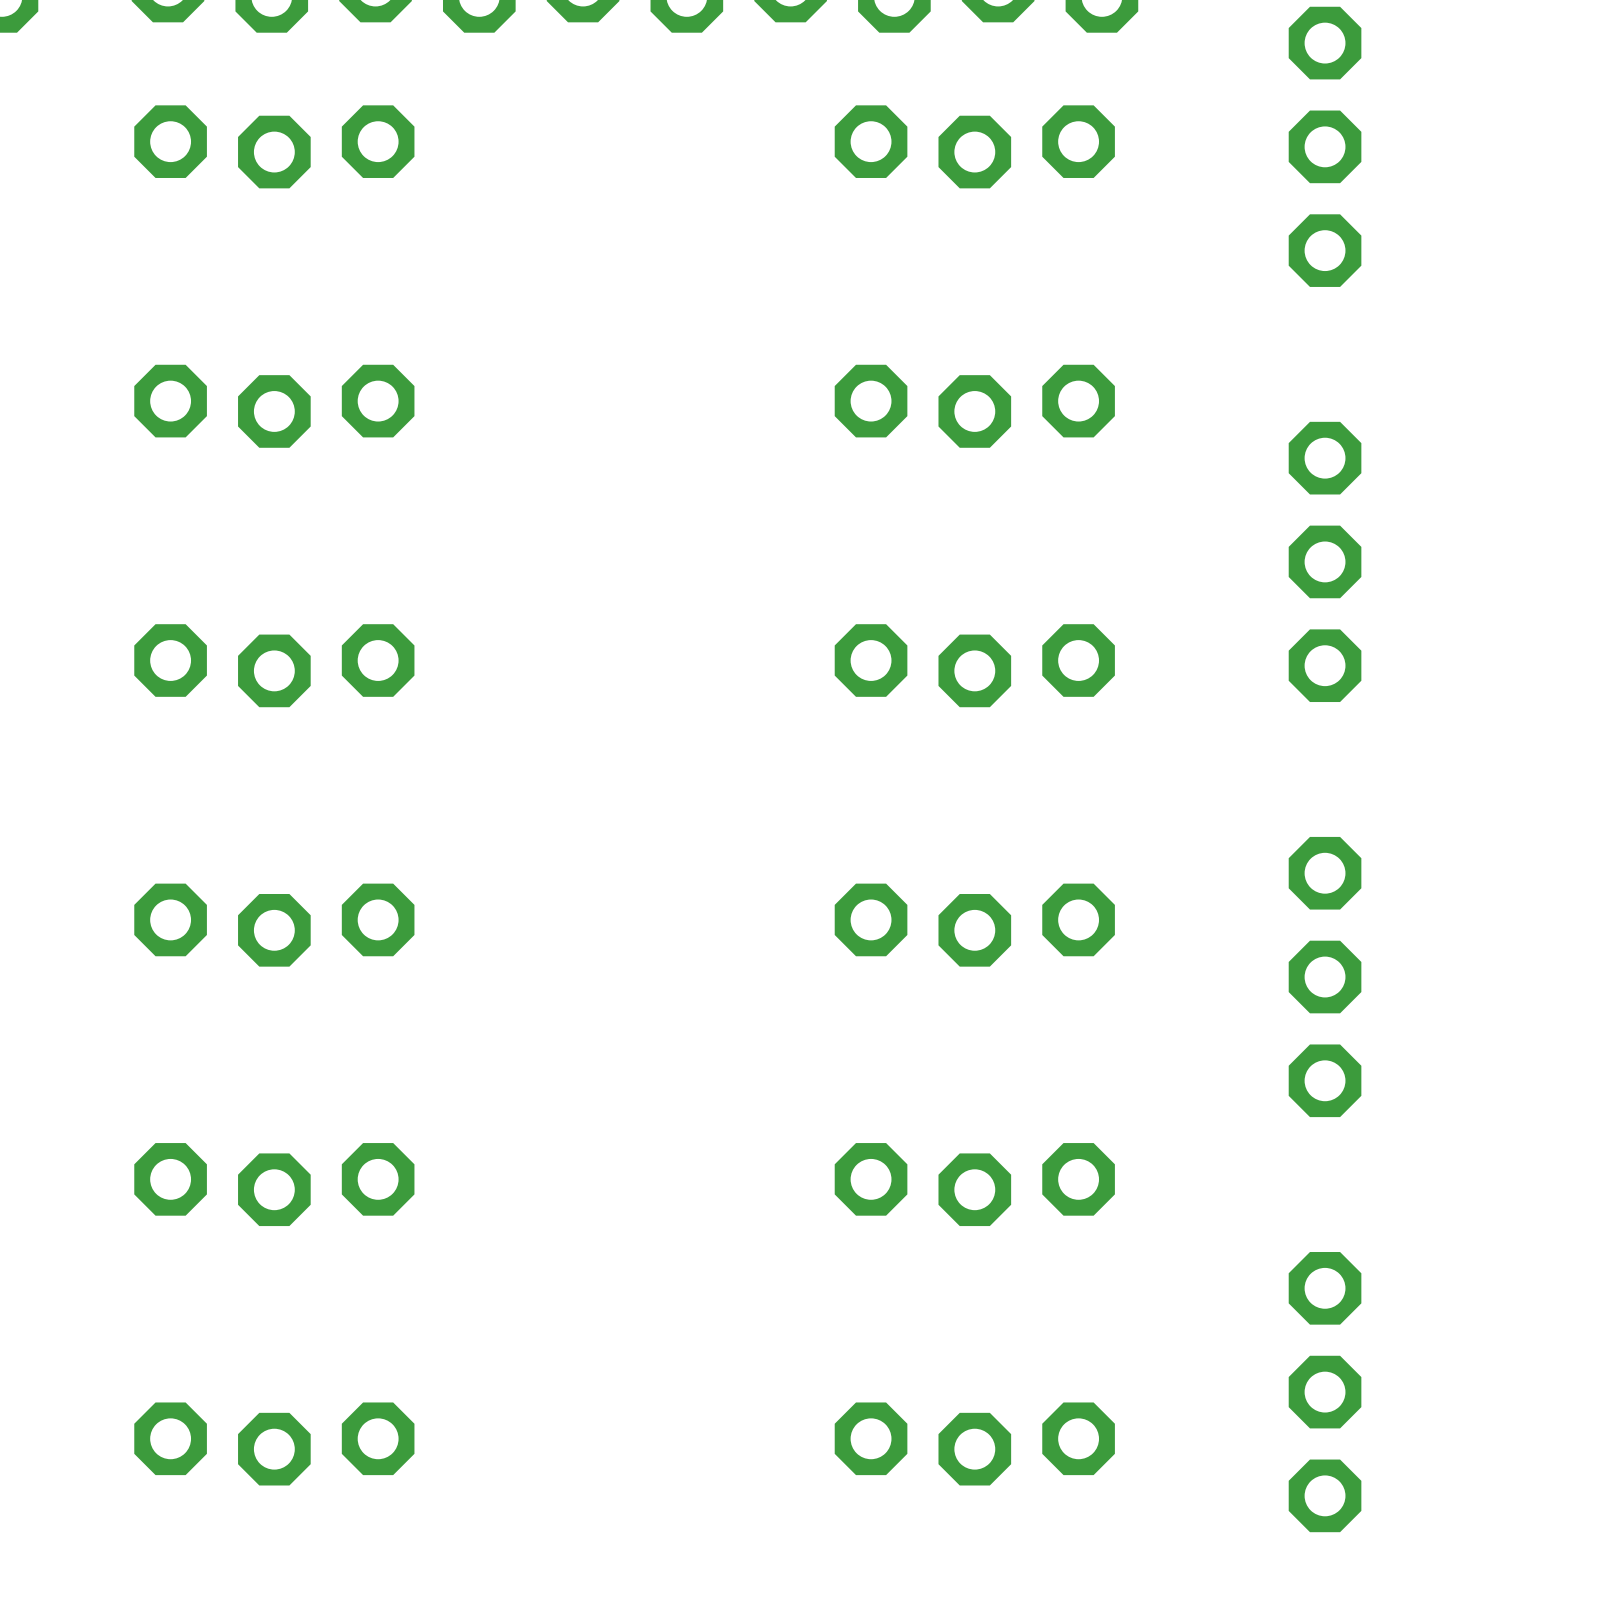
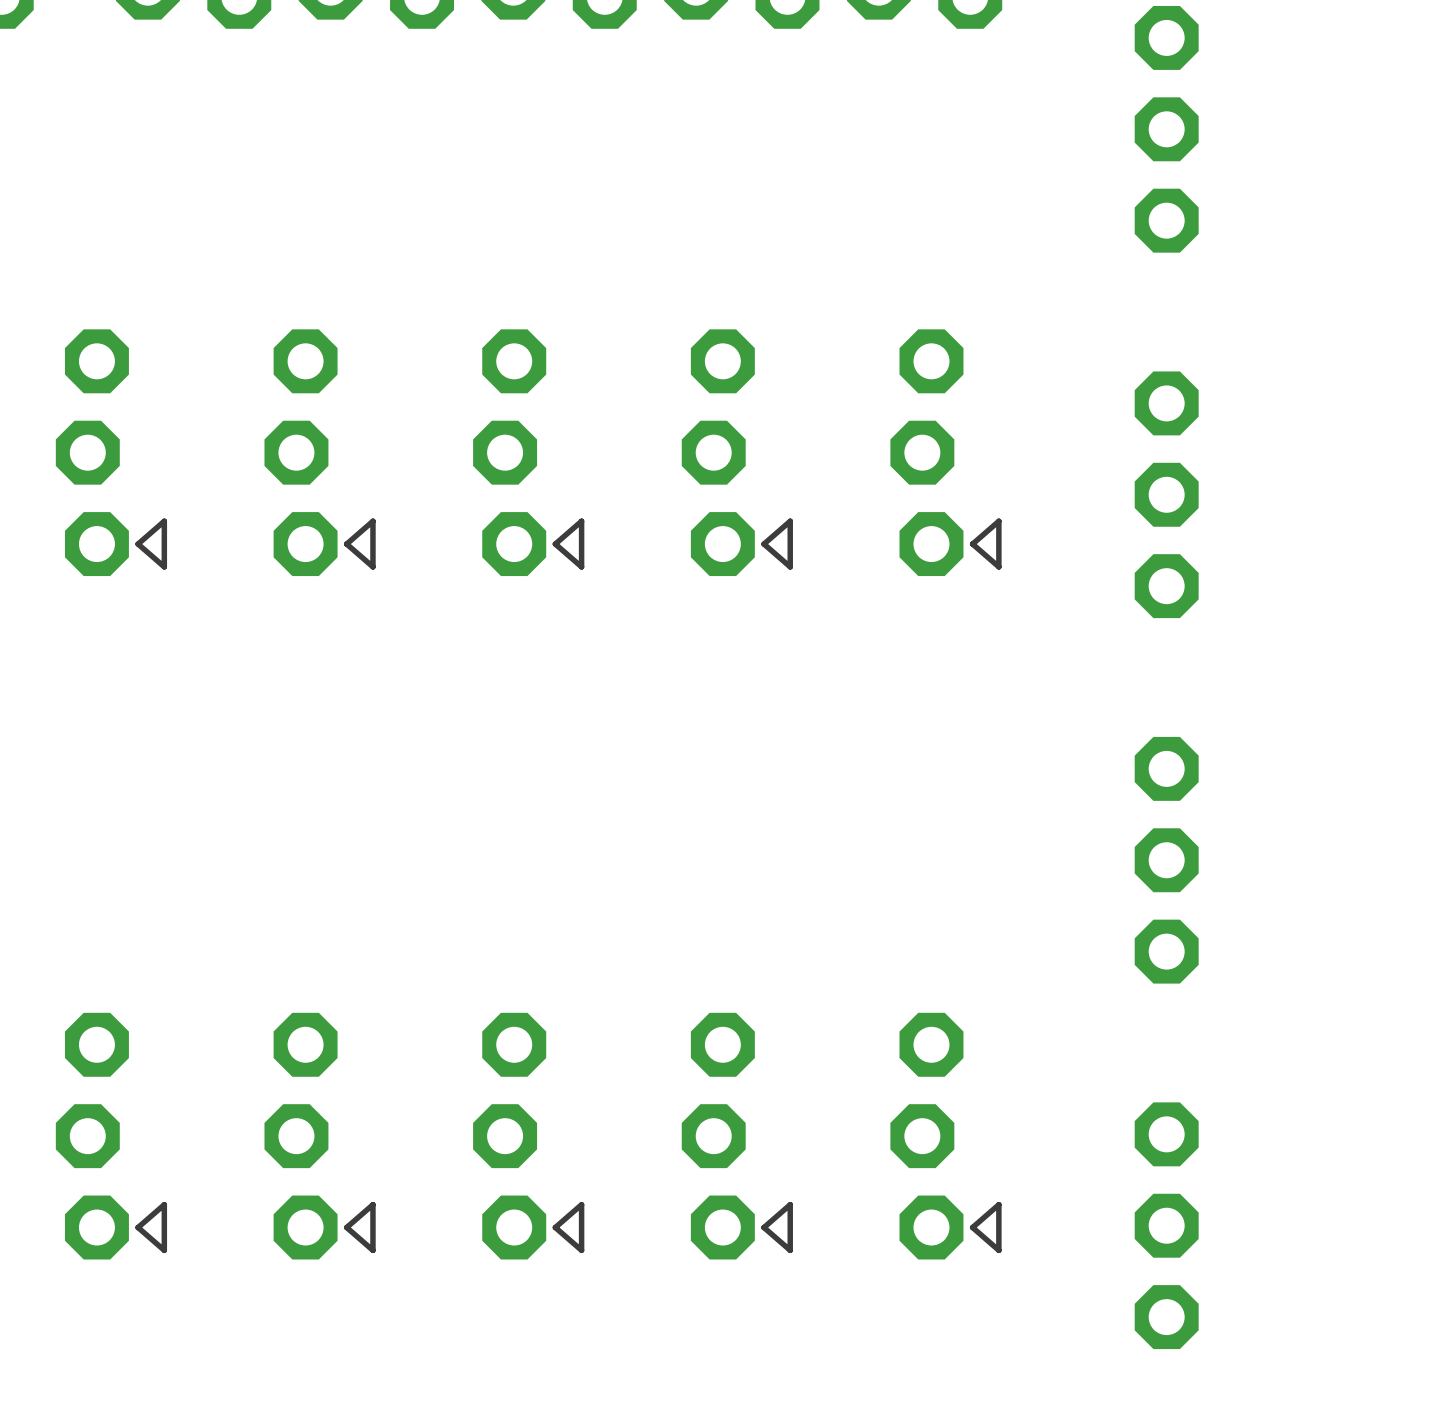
part: (274, 146) -> none
part: (974, 146) -> none
part: (274, 406) -> none
part: (974, 406) -> none
part: none -> (111, 452)
part: none -> (320, 452)
part: none -> (528, 452)
part: none -> (737, 452)
part: none -> (945, 452)
part: (274, 665) -> none
part: (974, 665) -> none
part: (274, 925) -> none
part: (974, 925) -> none
part: (274, 1184) -> none
part: (974, 1184) -> none
part: none -> (111, 1136)
part: none -> (320, 1136)
part: none -> (528, 1136)
part: none -> (737, 1136)
part: none -> (945, 1136)
part: (274, 1443) -> none
part: (974, 1443) -> none

